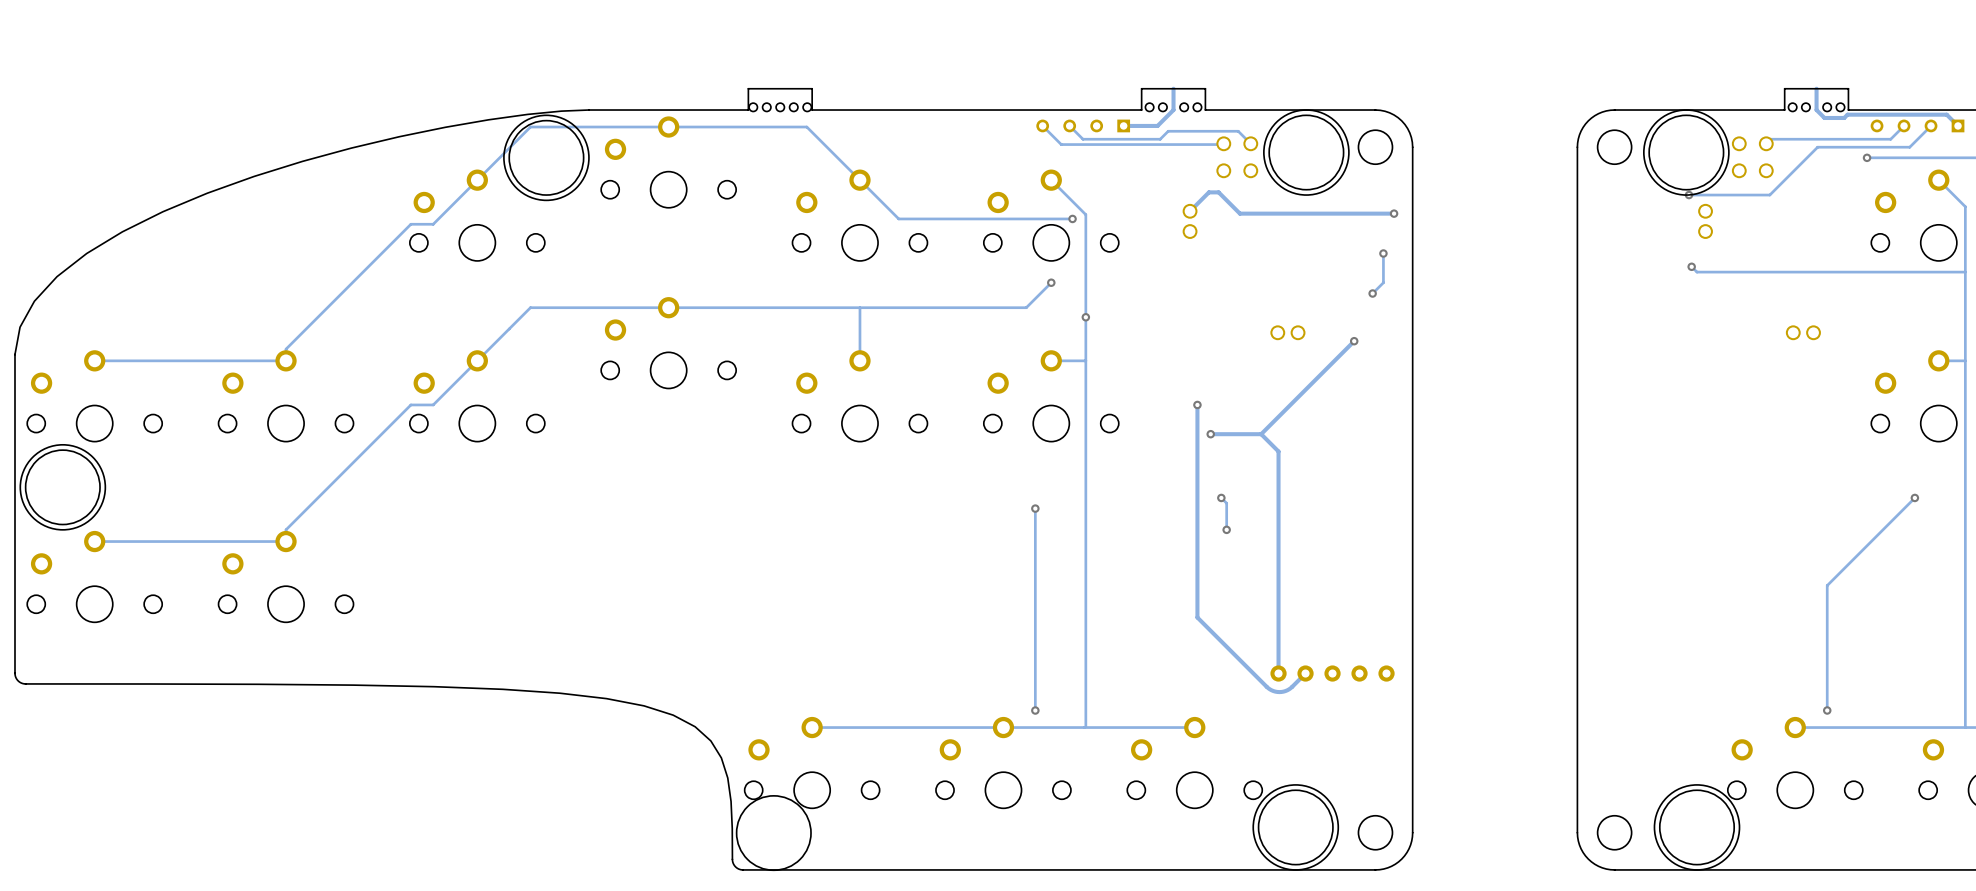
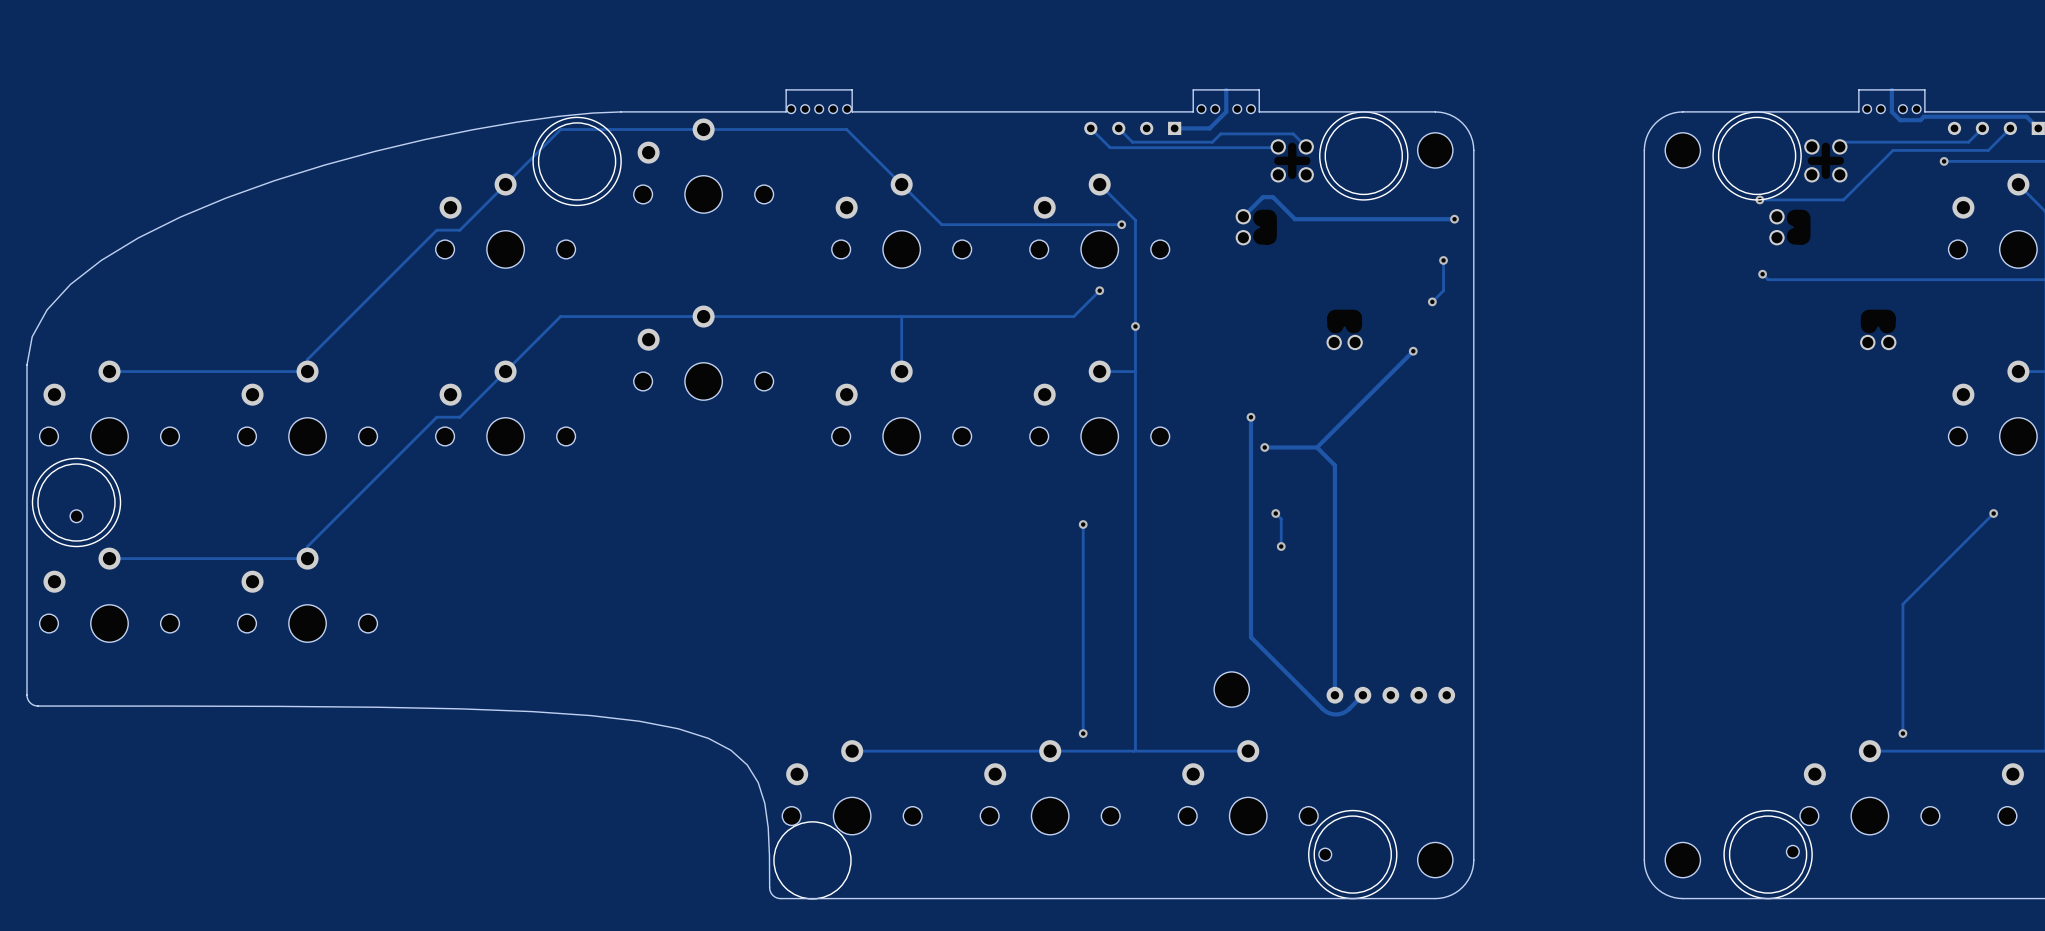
part: none -> (76, 516)
part: none -> (1231, 689)
part: none -> (1792, 851)
part: none -> (1325, 854)

